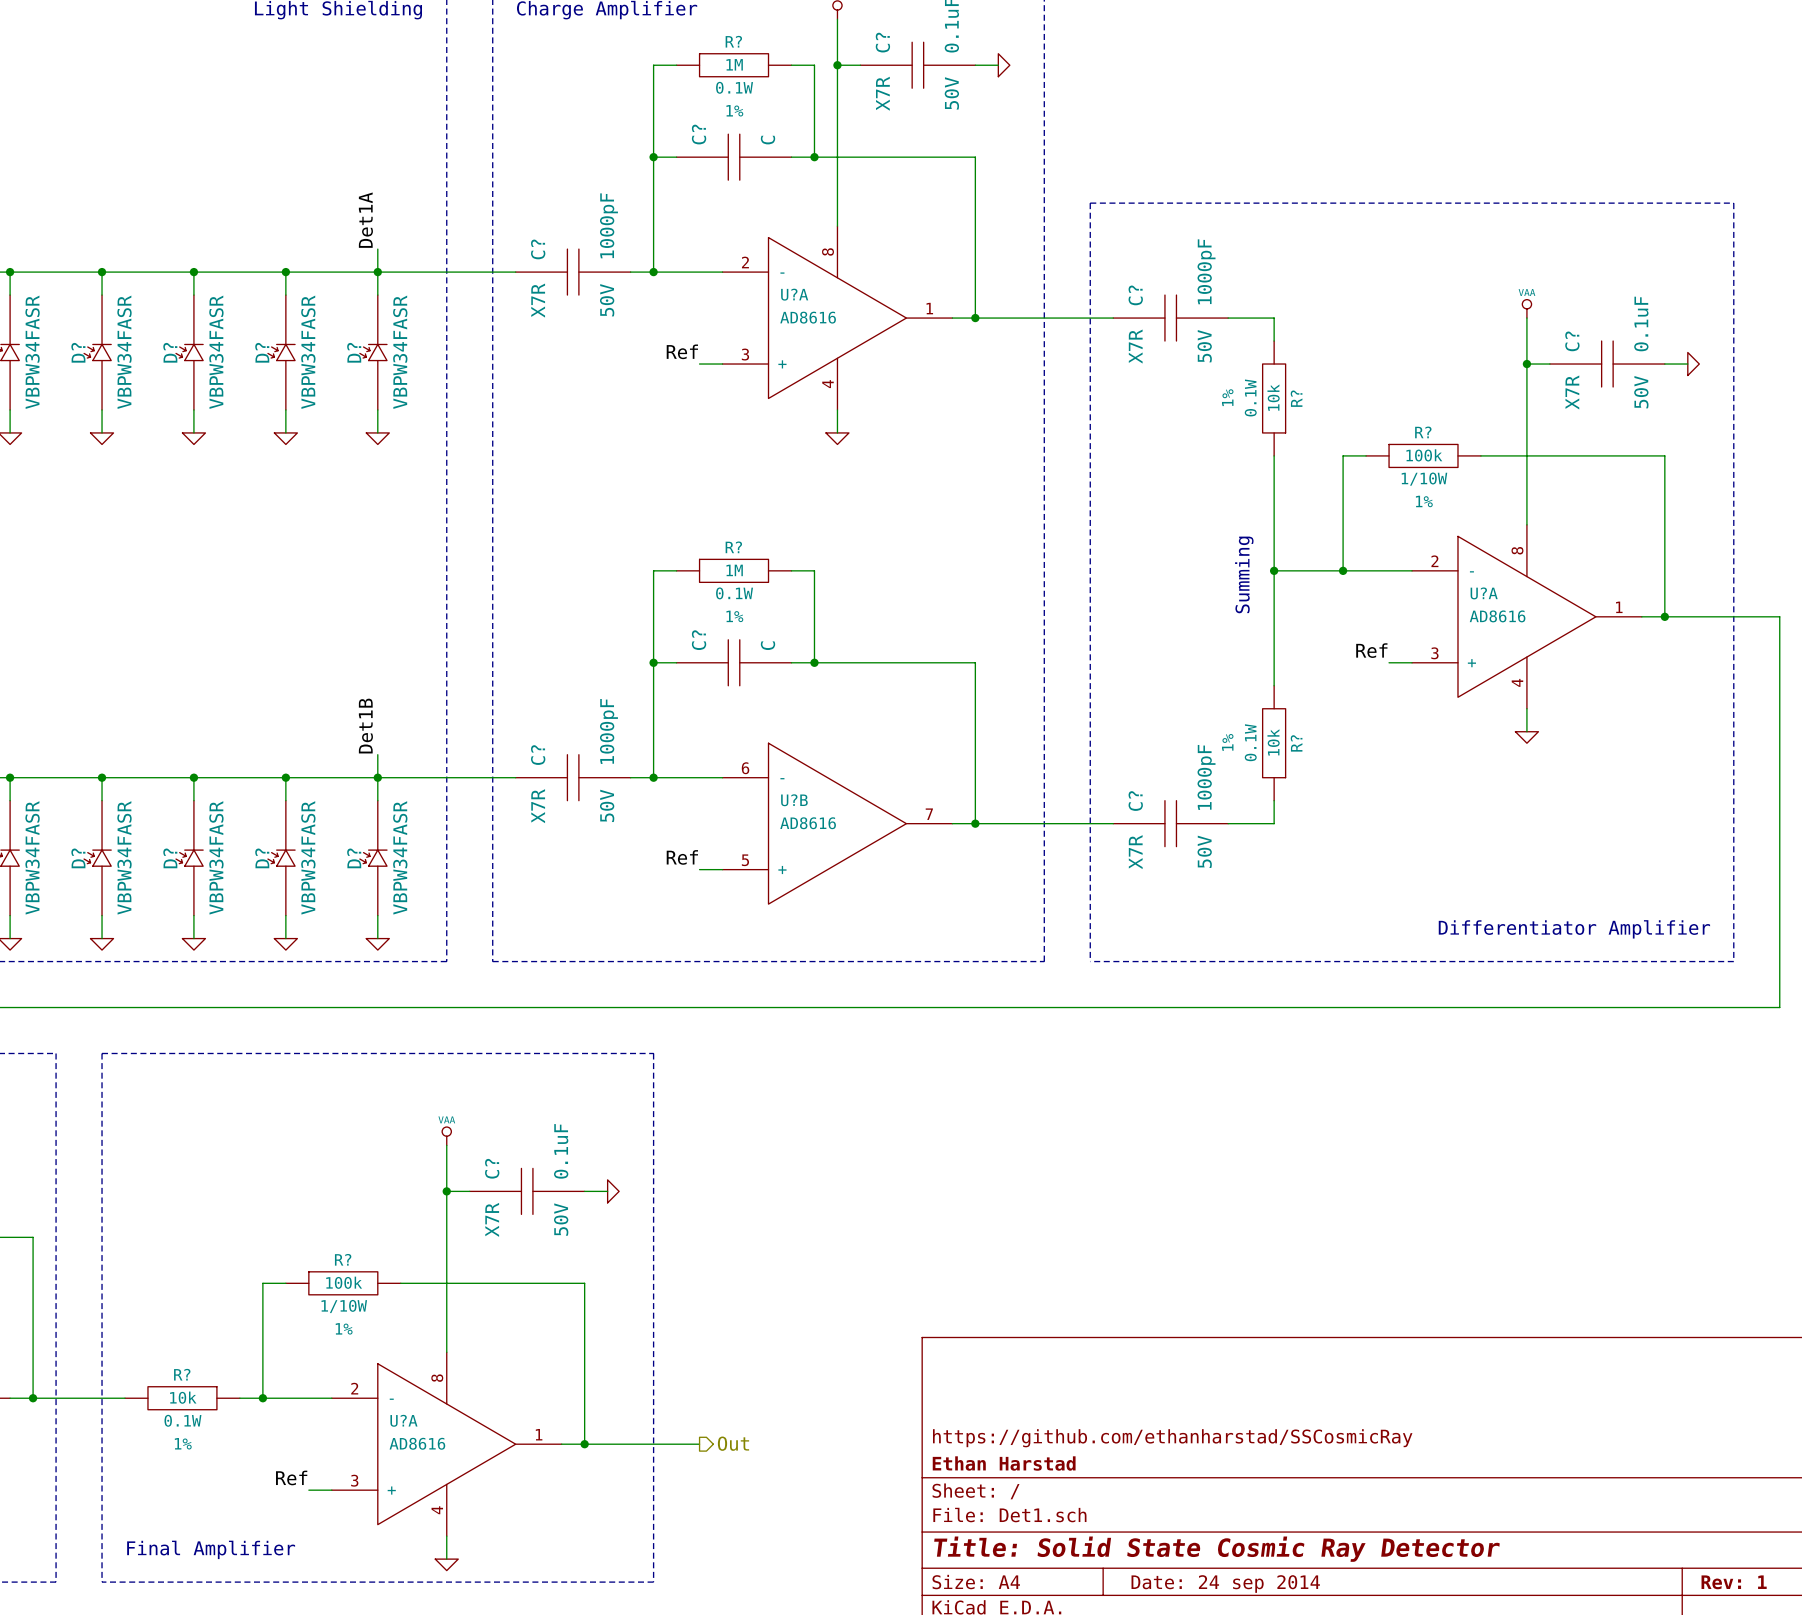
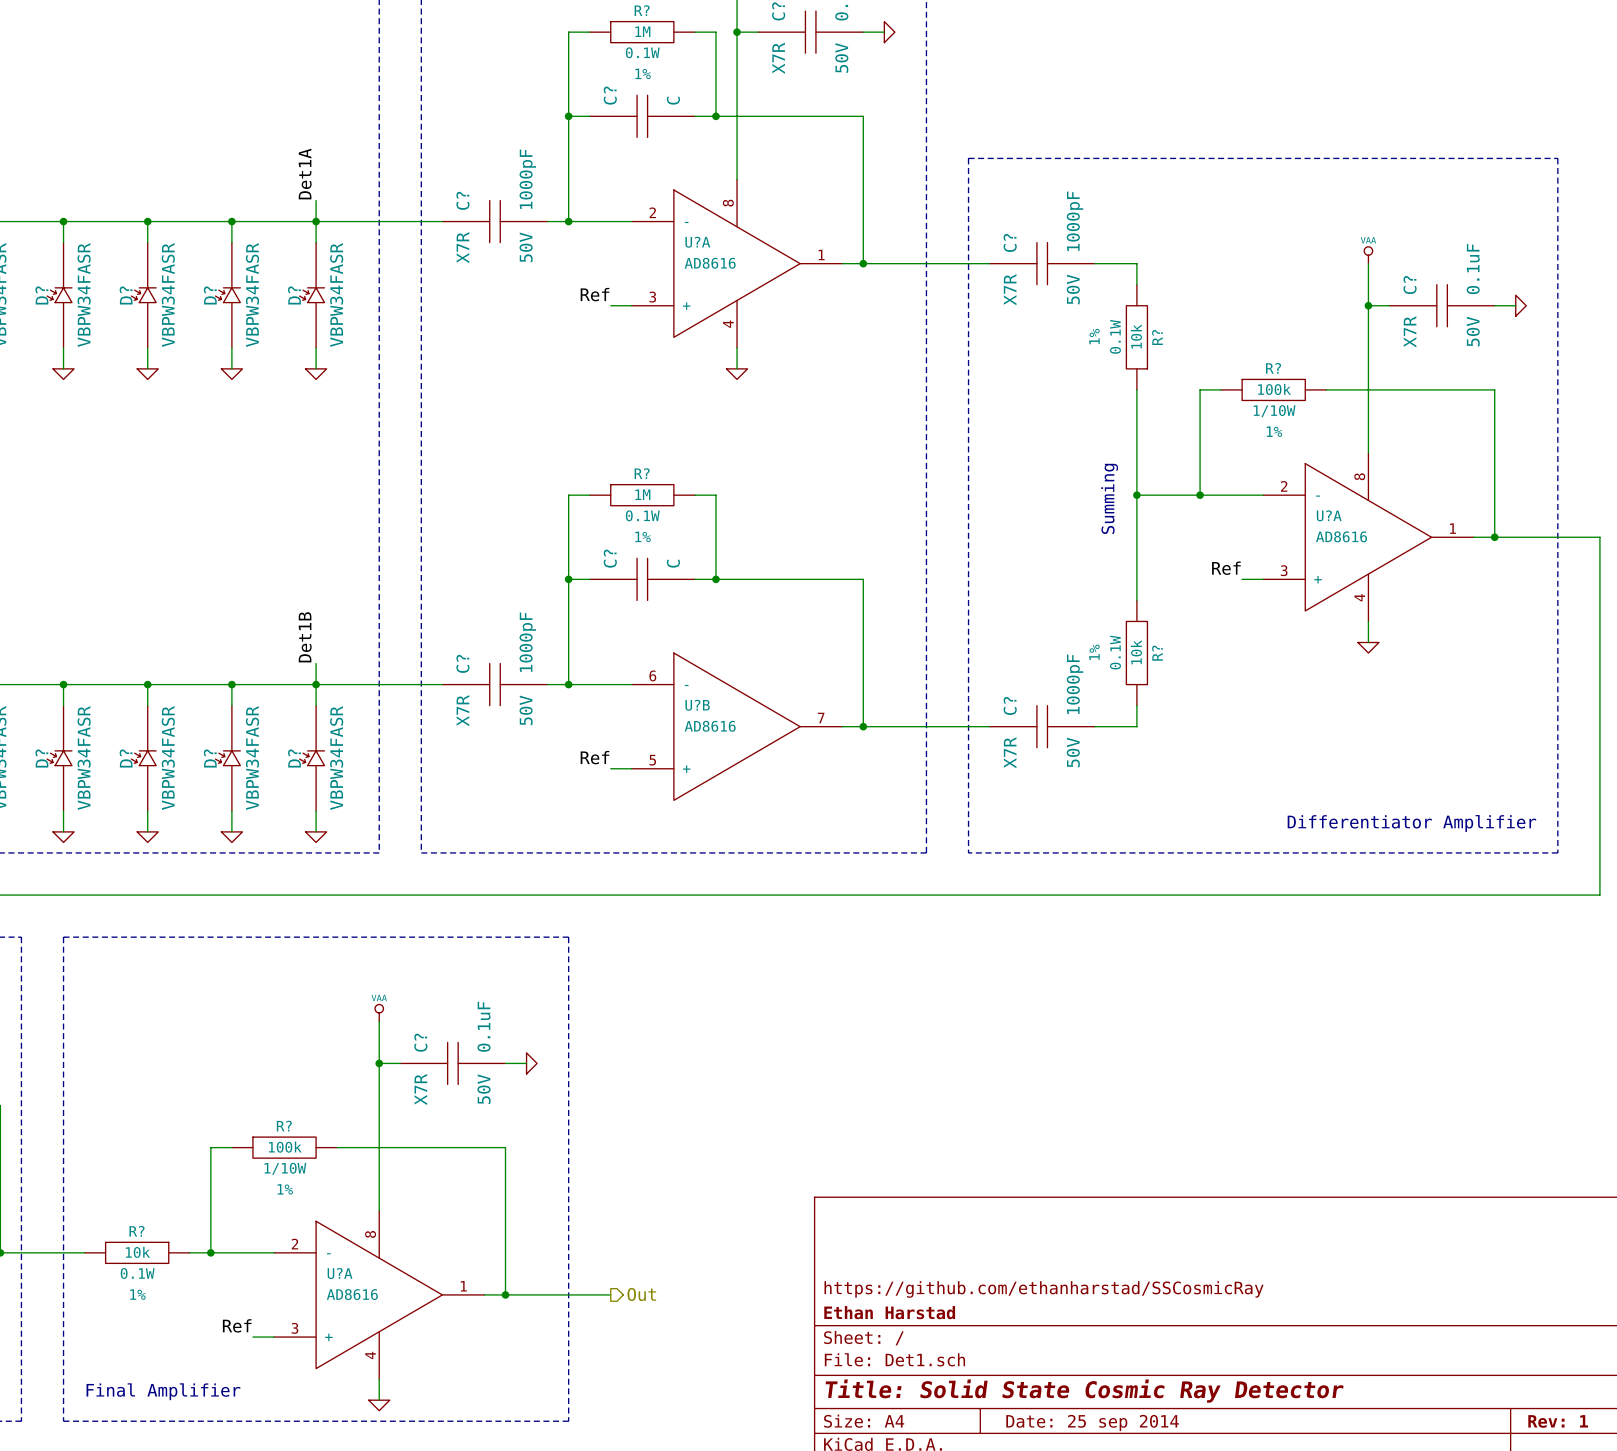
title block: Date: 24 sep 2014 (1225, 1584) -> Date: 25 sep 2014 (1092, 1422)

